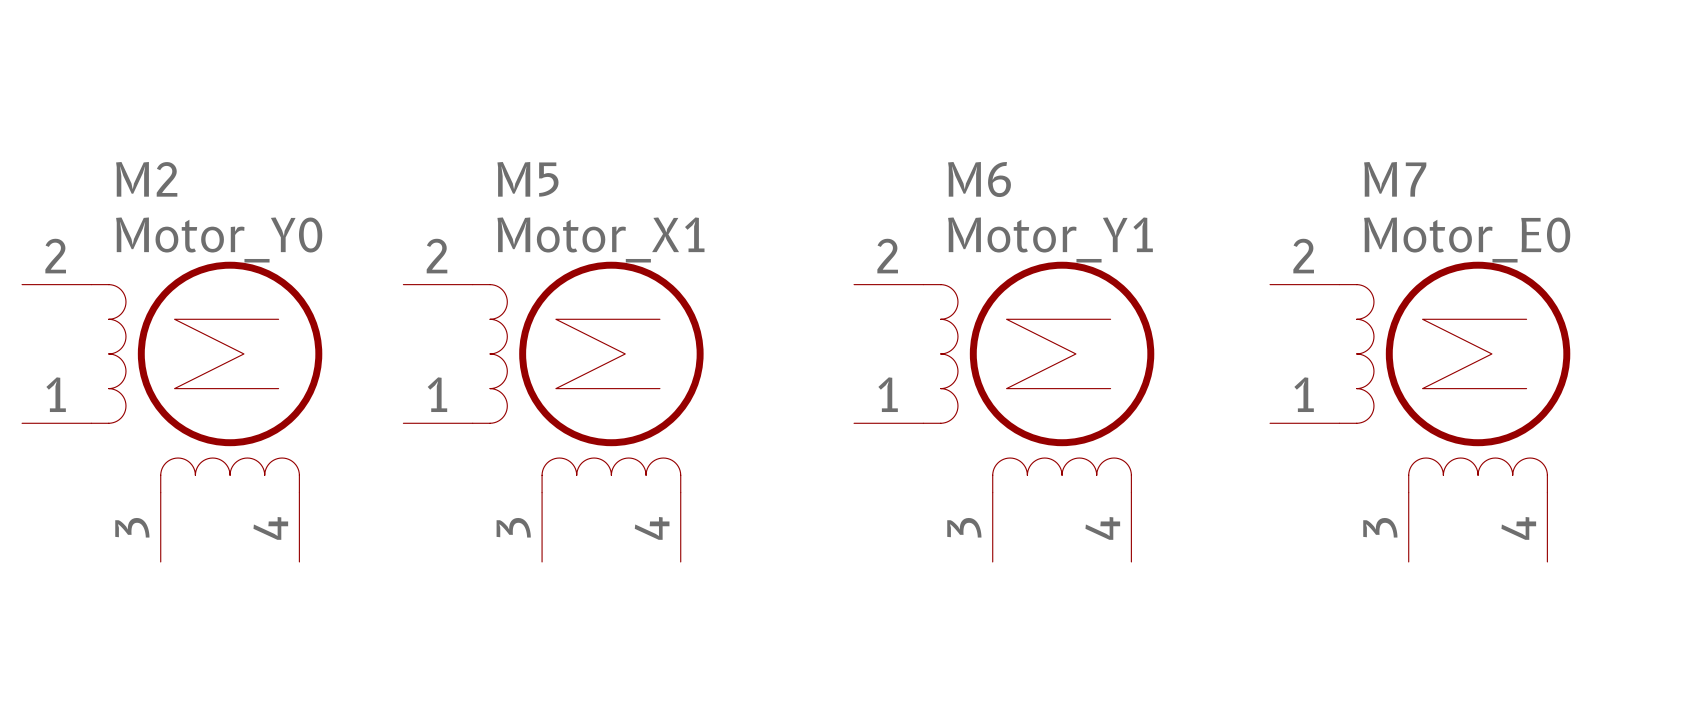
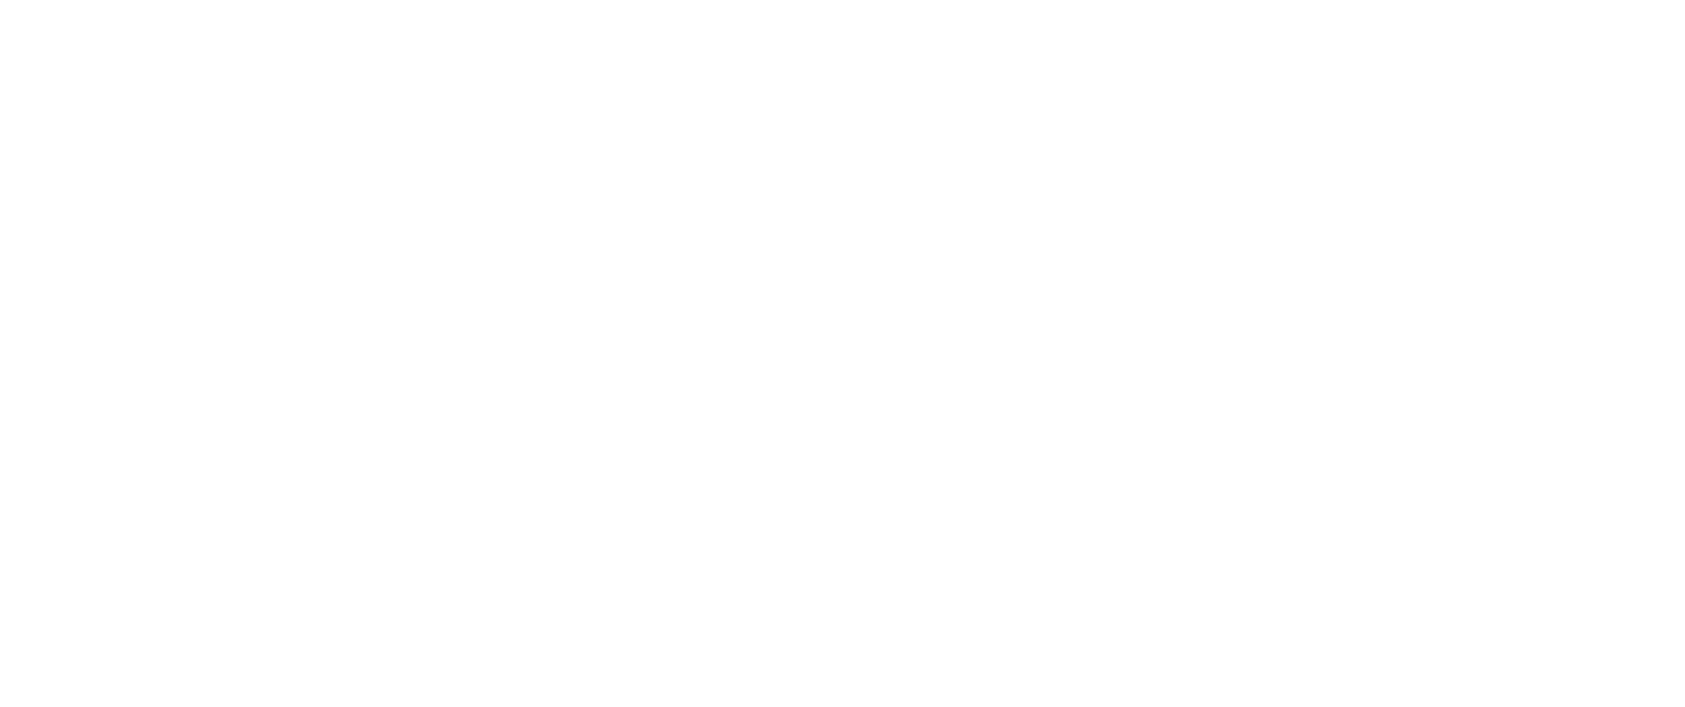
M2: Motor_Y0 (172, 411) -> none
M5: Motor_X1 (553, 411) -> none
M6: Motor_Y1 (1004, 411) -> none
M7: Motor_E0 (1420, 411) -> none

